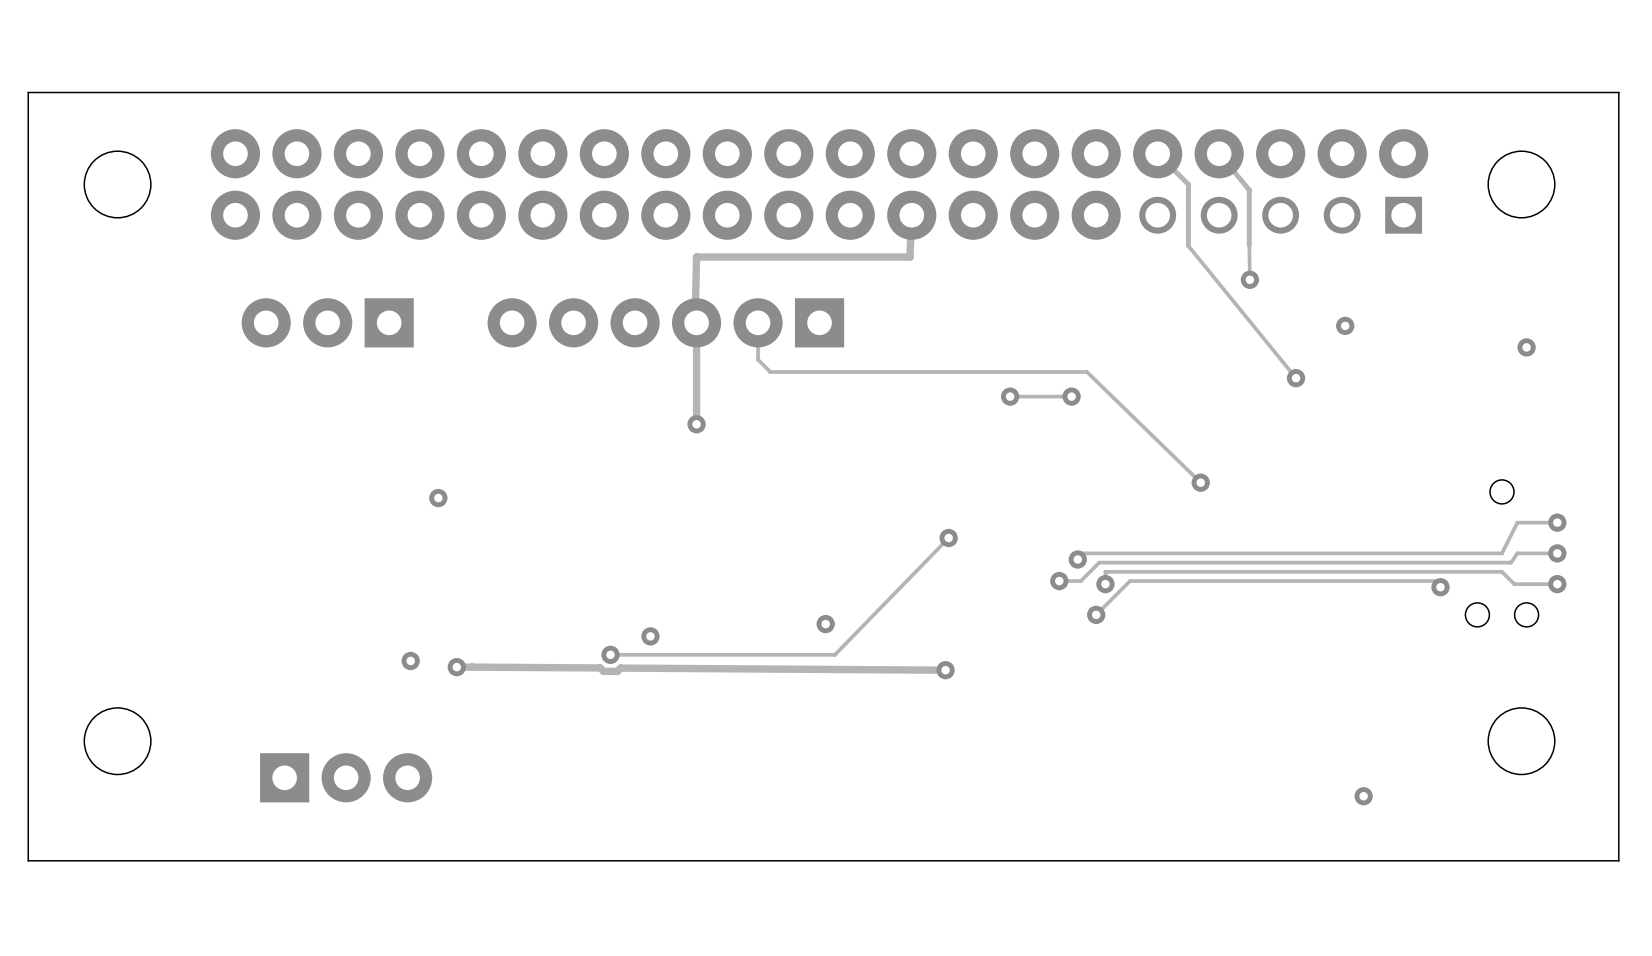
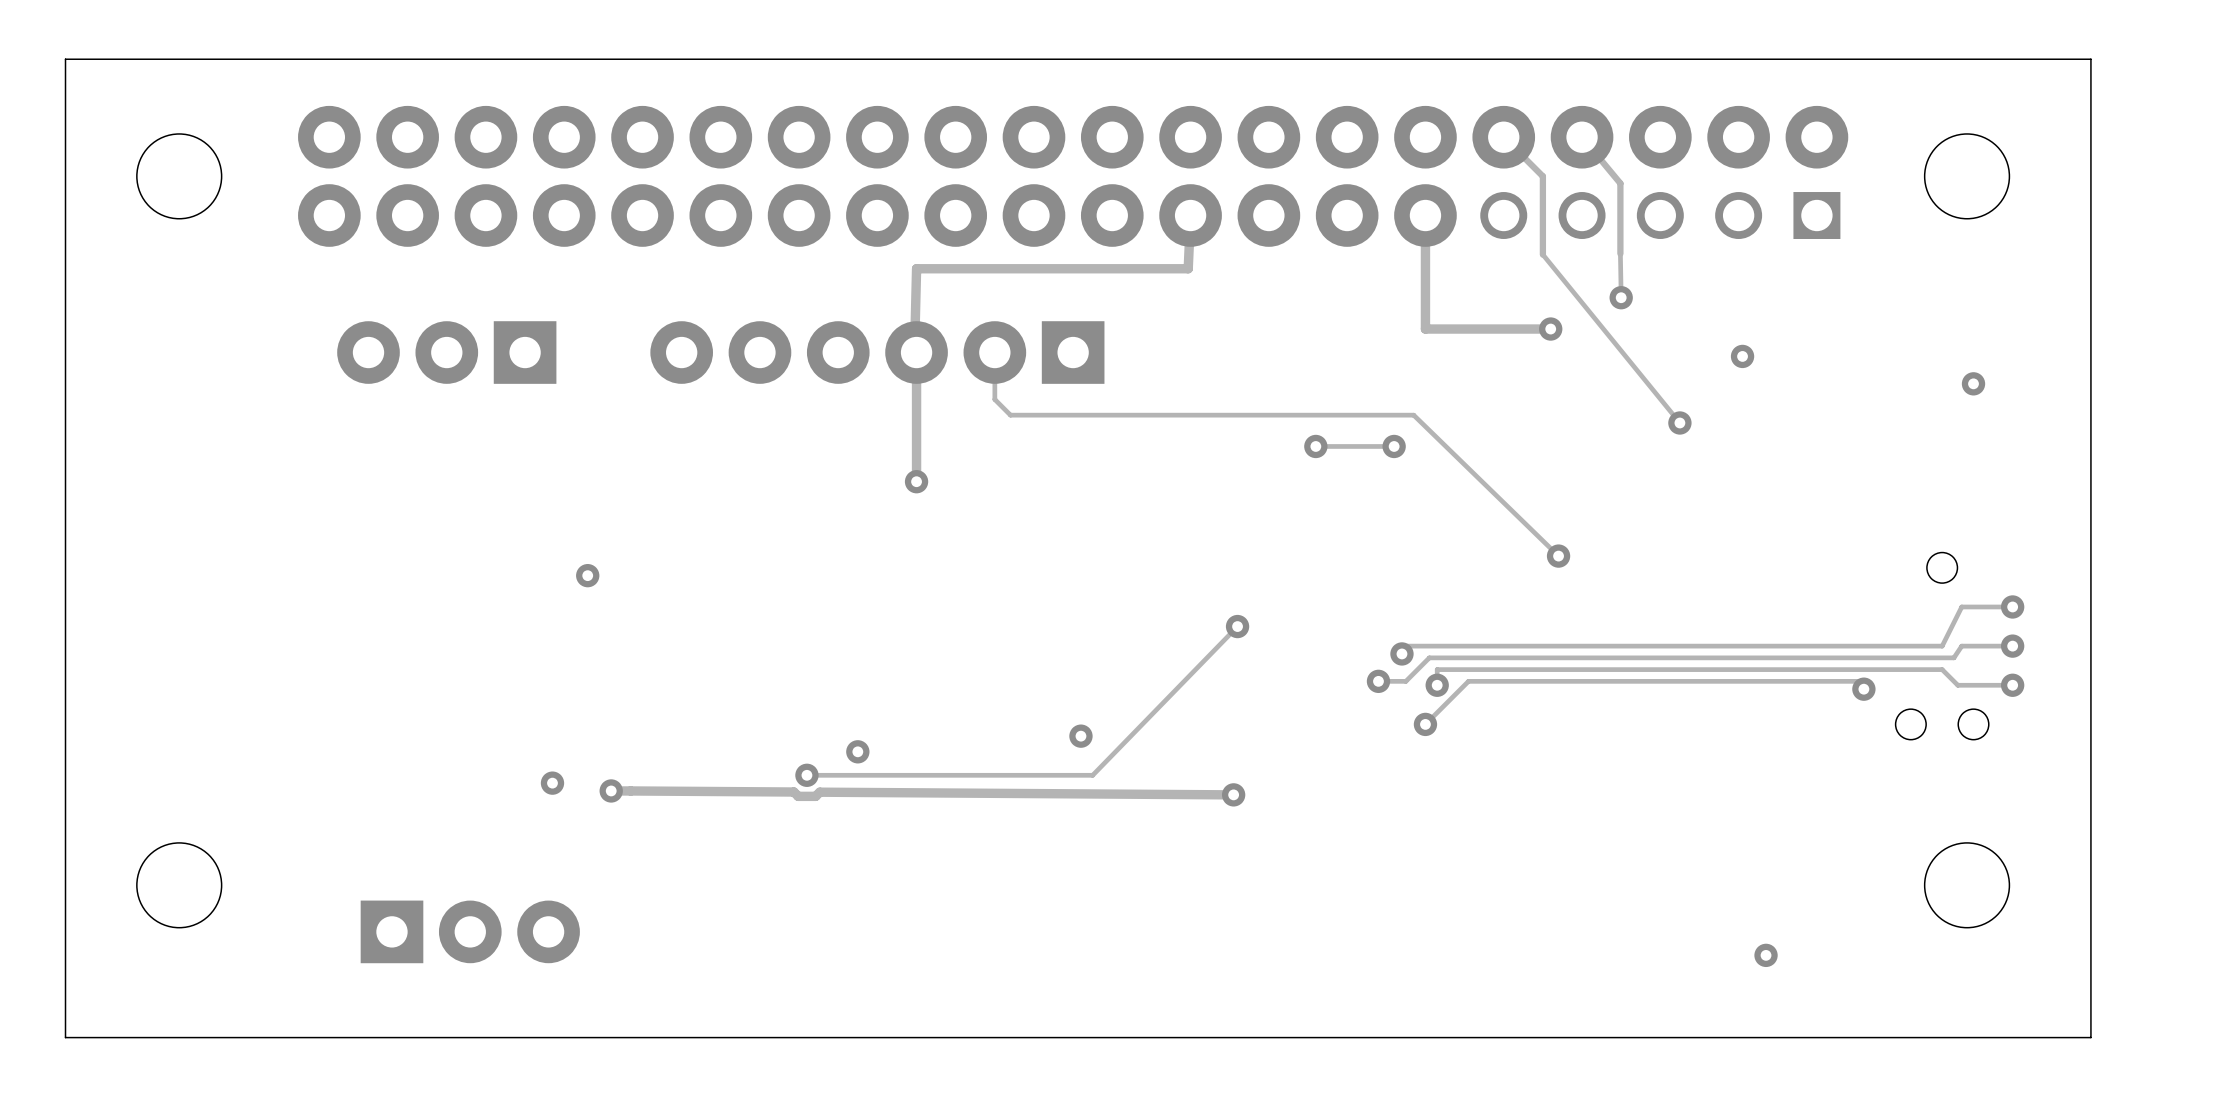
track: none -> (1425, 215) (1425, 329) (1550, 329)
via: none -> (1550, 329)

